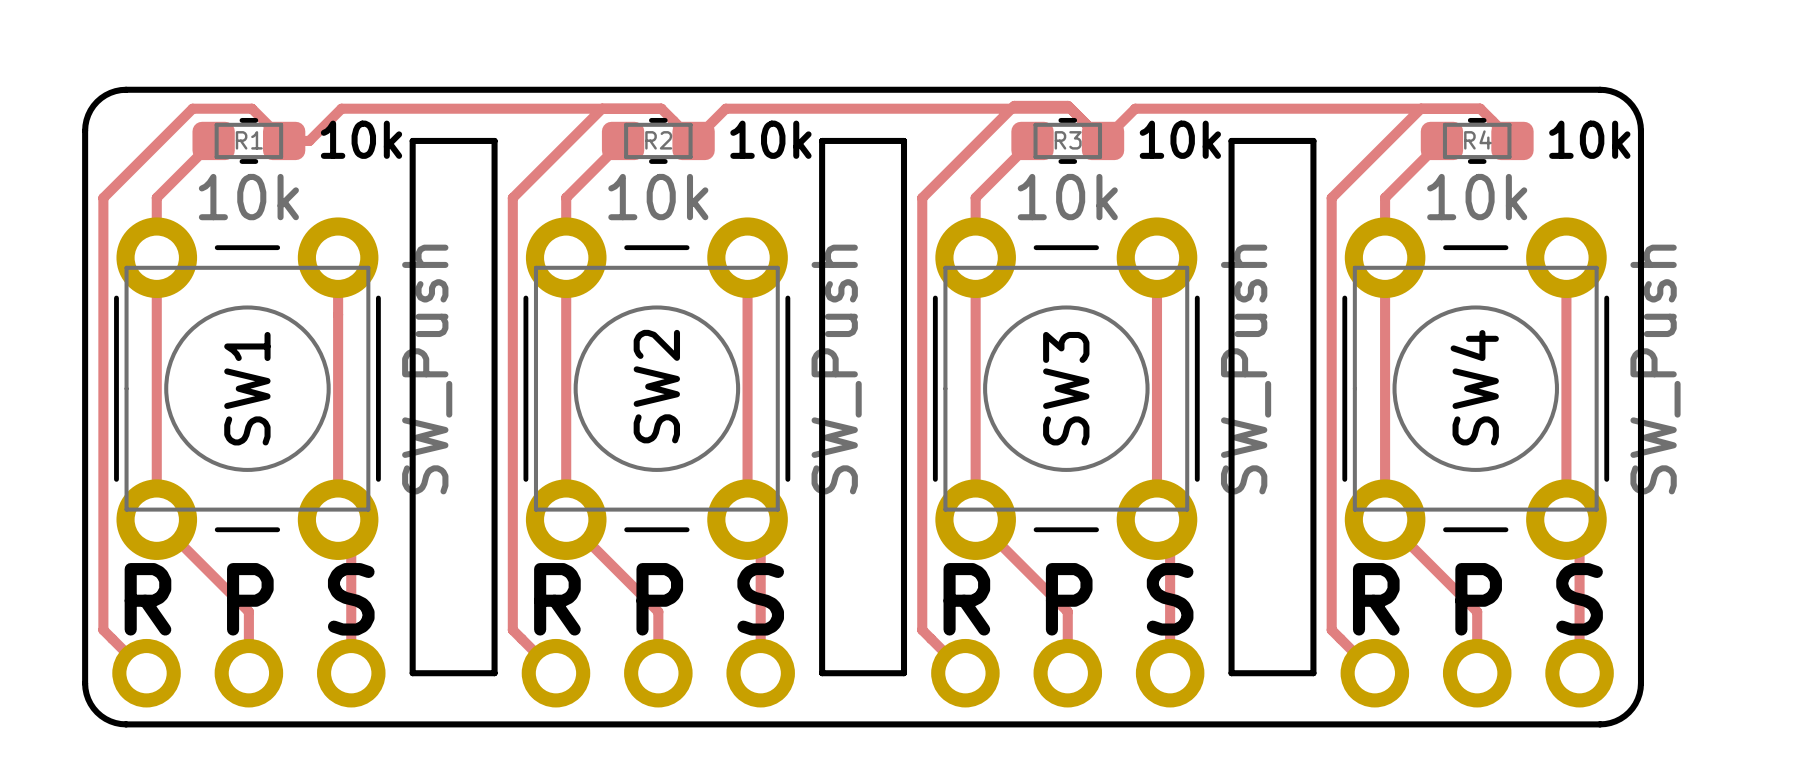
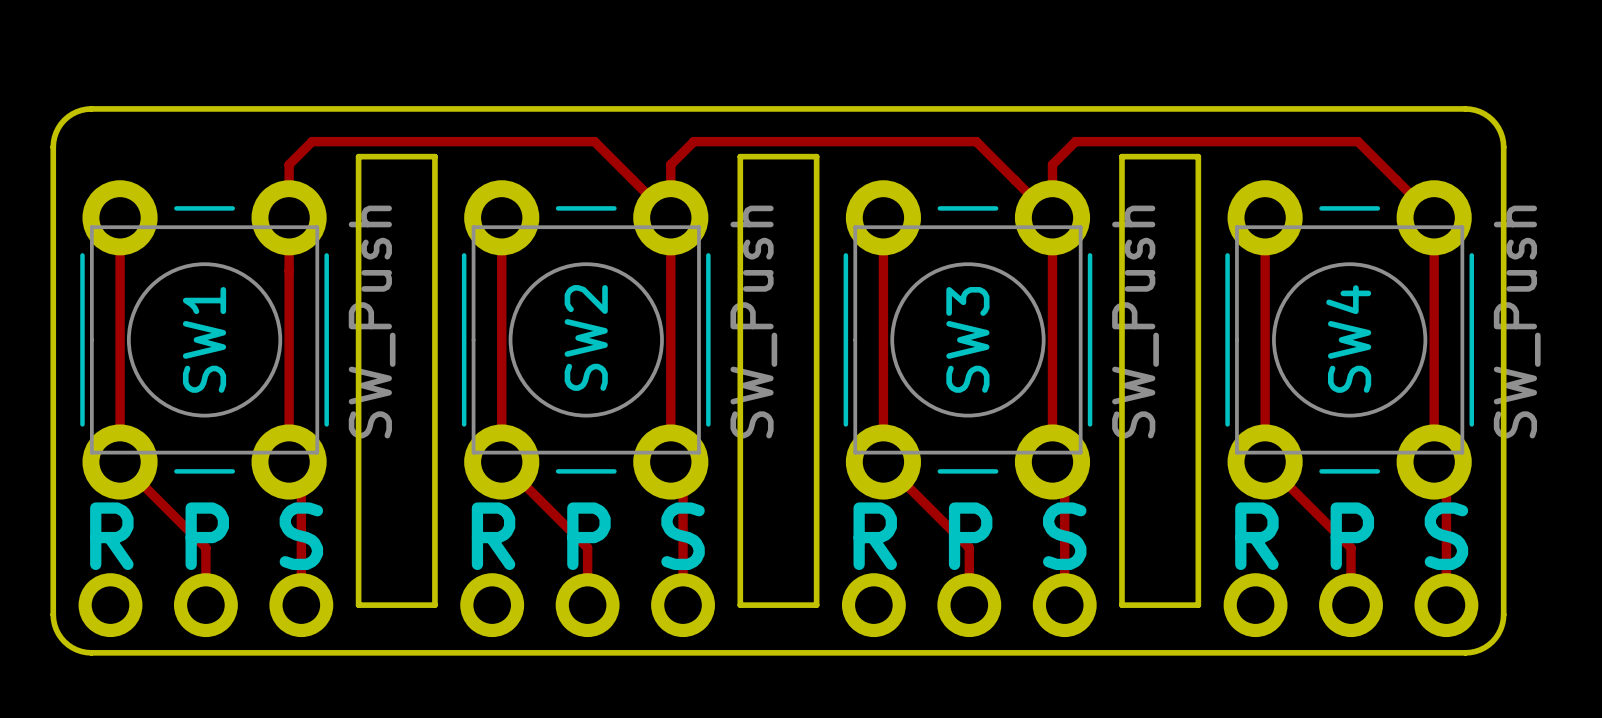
track: (602, 108) (512, 197) (512, 630) (555, 673) -> none
track: (1070, 108) (725, 108) (693, 140) (661, 108) (341, 108) (309, 140) (284, 140) (251, 108) (192, 108) (103, 197) (103, 630) (146, 673) -> none
track: (1420, 108) (1331, 197) (1331, 630) (1374, 673) -> none
text: 10k (361, 139) -> none
text: 10k (770, 139) -> none
text: 10k (1180, 139) -> none
text: 10k (1589, 139) -> none
track: (213, 140) (156, 197) (156, 257) -> none
R1: 10k (248, 140) -> none
board edge: (412, 140) (412, 192) -> (434, 156) (358, 156)
board edge: (494, 140) (494, 192) -> (434, 108) (740, 108)
track: (623, 140) (566, 197) (566, 257) -> none
R2: 10k (658, 140) -> none
board edge: (822, 140) (822, 192) -> (816, 156) (740, 156)
board edge: (903, 140) (903, 192) -> (816, 108) (1121, 108)
track: (1032, 140) (975, 197) (975, 257) -> none
R3: 10k (1067, 140) -> none
board edge: (1231, 140) (1231, 192) -> (1198, 156) (1121, 156)
board edge: (1313, 140) (1313, 192) -> (1198, 108) (1470, 109) (1484, 114) (1495, 123) (1502, 137) (1503, 147)
track: (1441, 140) (1385, 197) (1385, 257) -> none
R4: 10k (1477, 140) -> none
track: (1512, 140) (1480, 108) (1135, 108) (1103, 140) (1067, 105) (1014, 105) (922, 197) (922, 630) (965, 673) -> none
board edge: (85, 181) (85, 130) (88, 115) (101, 98) (110, 92) (126, 89) (1600, 89) (1620, 95) (1632, 105) (1637, 115) (1640, 130) (1640, 181) -> (53, 147) (56, 132) (61, 123) (72, 114) (86, 109) (358, 108)
track: none -> (289, 217) (289, 164) (312, 141) (594, 141) (670, 217) (670, 164) (693, 141) (976, 141) (1052, 217) (1052, 164) (1075, 141) (1357, 141) (1434, 217)

